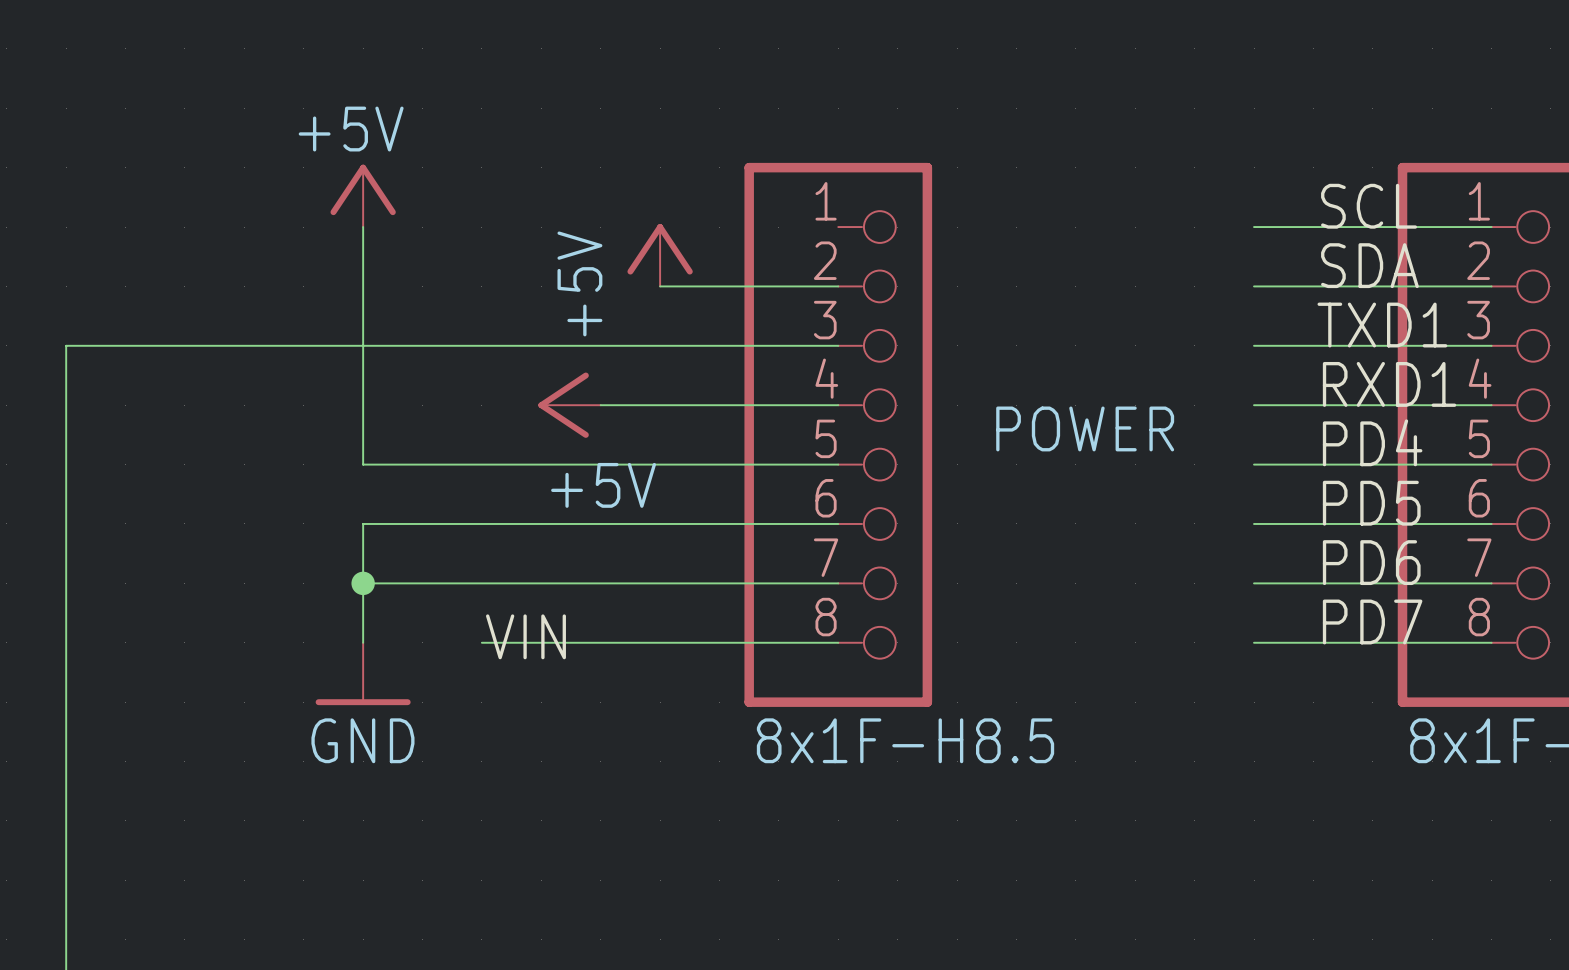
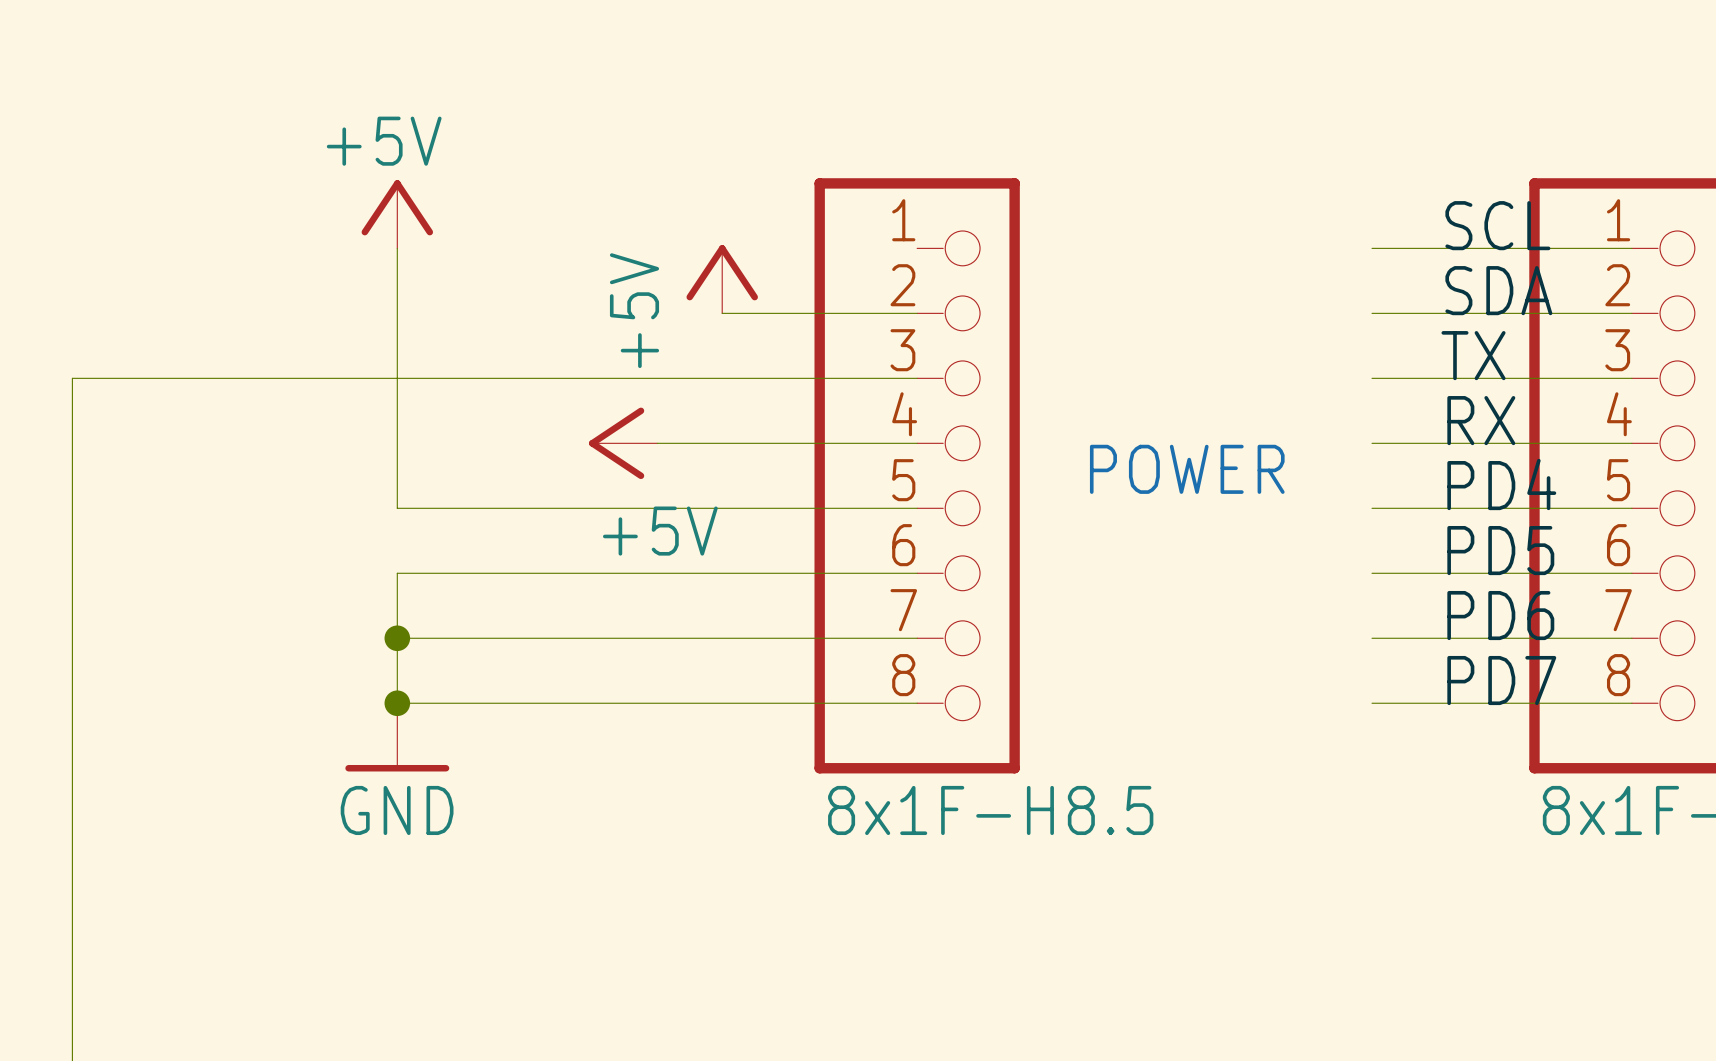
label: TXD1 (1382, 325) -> TX (1473, 355)
label: RXD1 (1389, 384) -> RX (1481, 420)
label: VIN (525, 636) -> none
wire: none -> (397, 703) (527, 703)
junction: none -> (397, 703)

